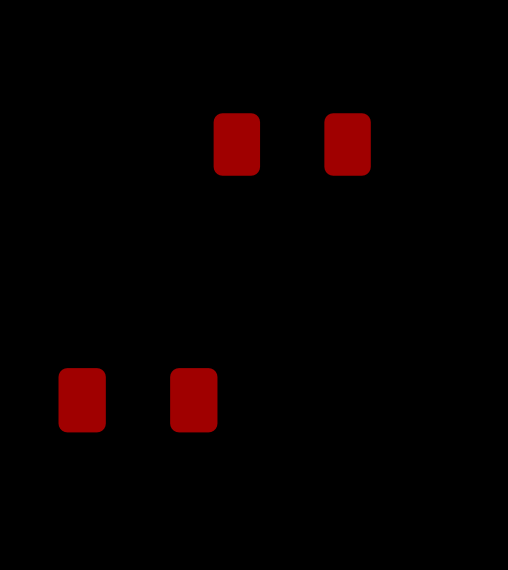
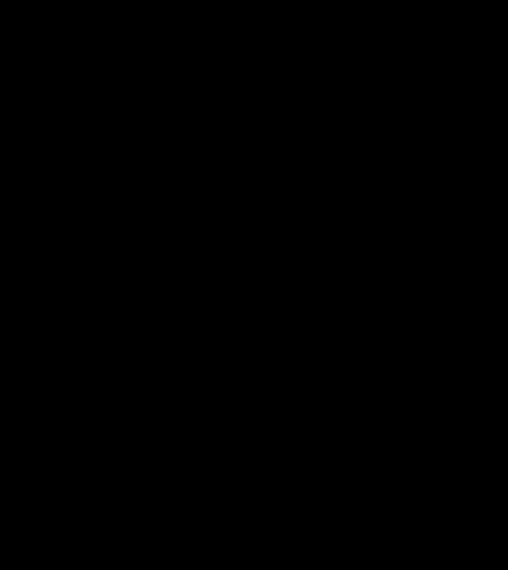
part: (292, 144) -> none
part: (137, 400) -> none

